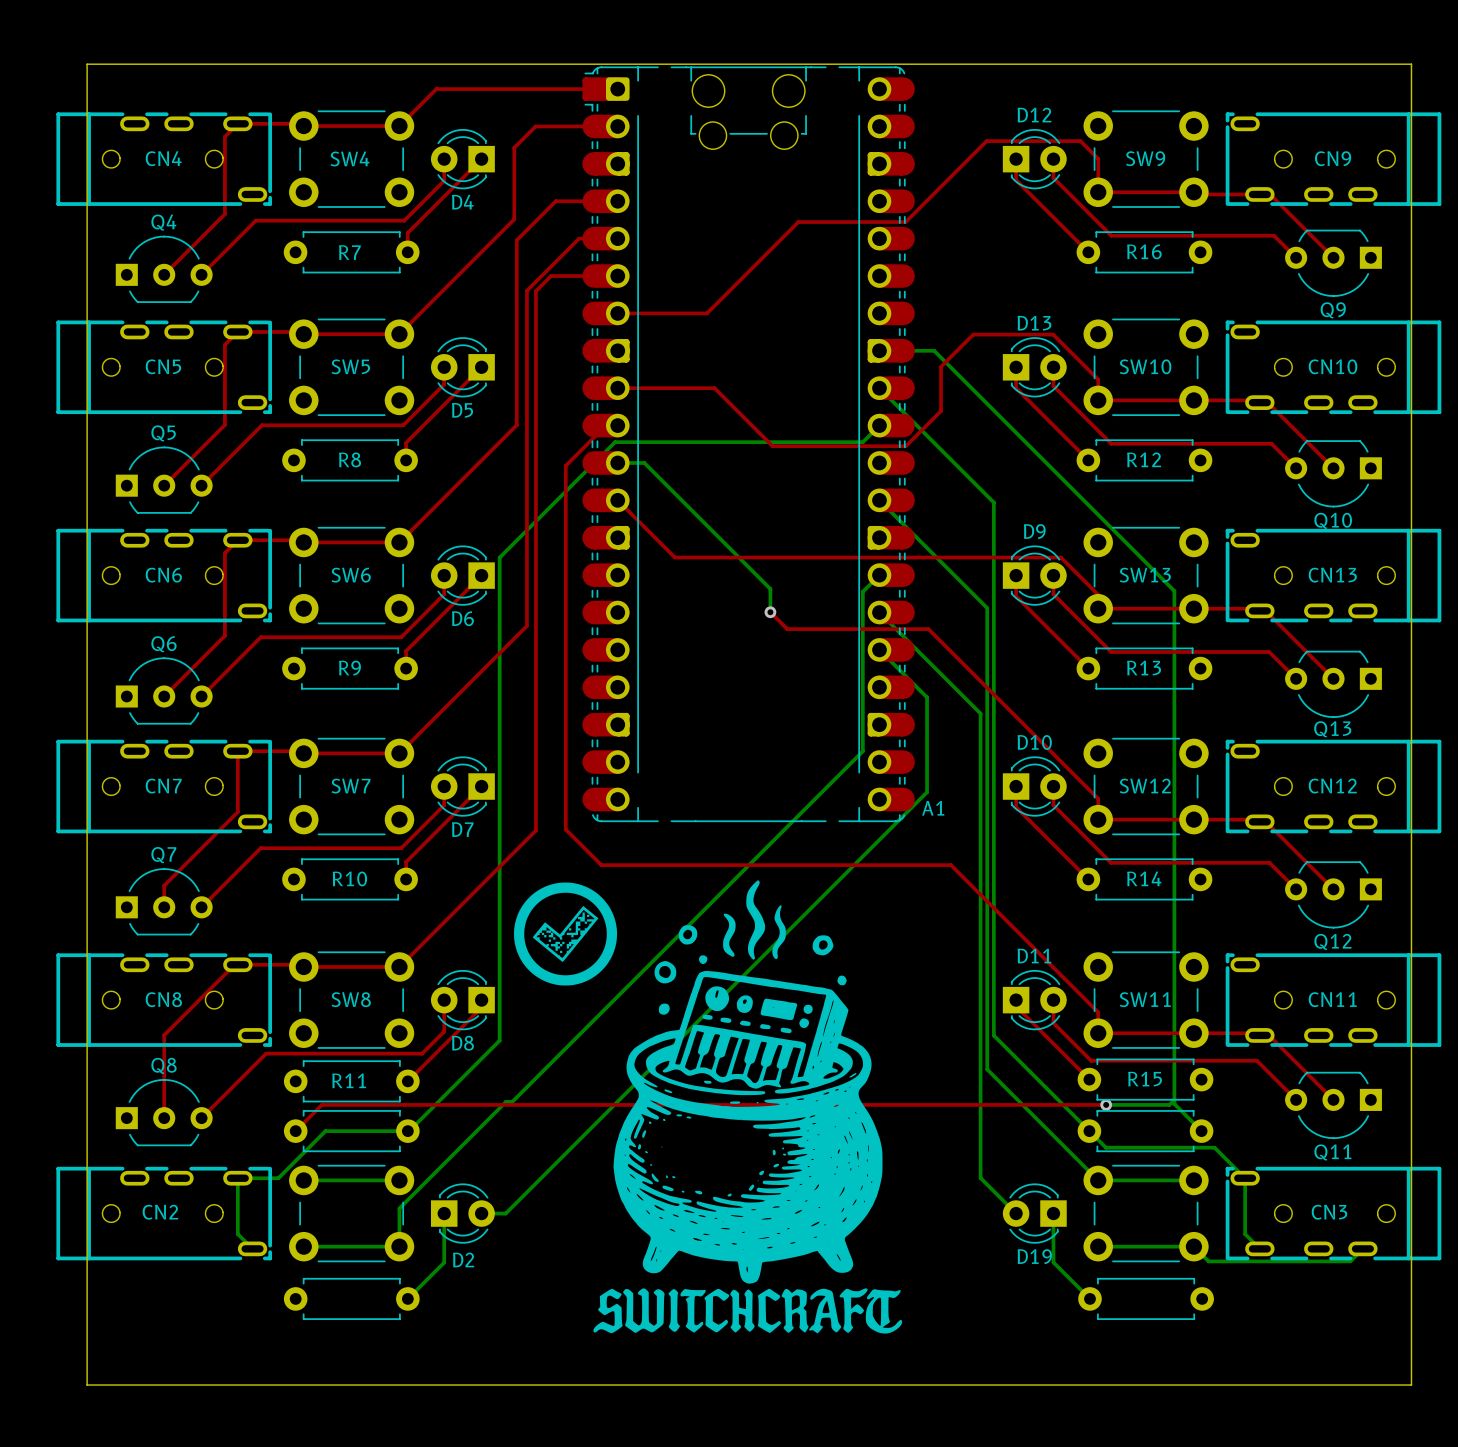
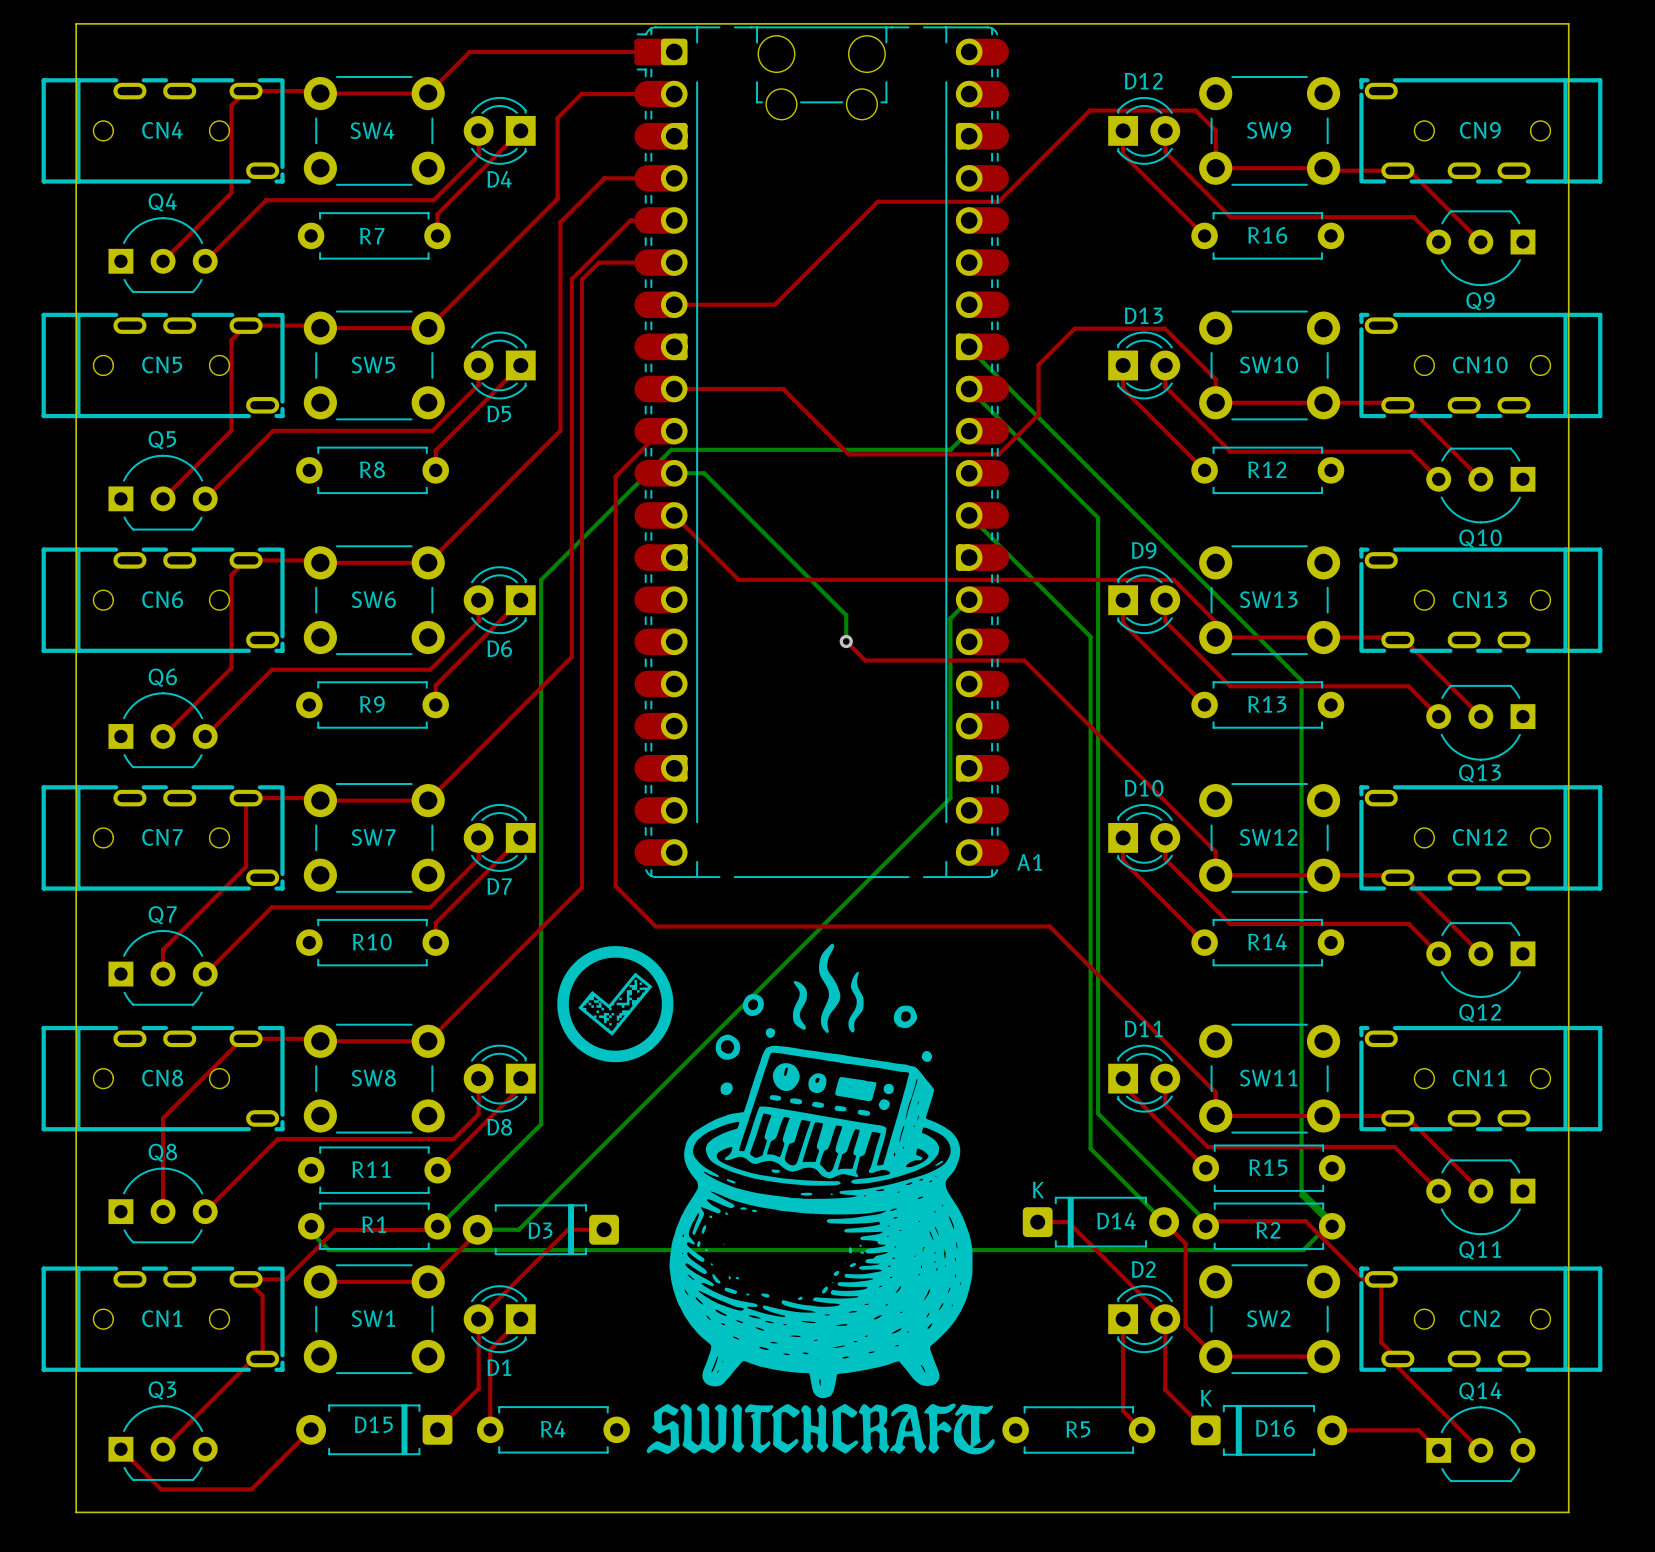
bottom track: (879, 350) (934, 350) (1174, 591) (1174, 646) -> (969, 348) (1301, 680)
bottom track: (879, 612) (980, 713) (980, 1178) (1016, 1213) -> none
bottom track: (879, 649) (927, 697) (927, 792) (505, 1213) (481, 1213) -> none
bottom track: (993, 1031) (993, 1035) (1105, 1147) (1214, 1147) (1245, 1178) (1245, 1234) (1259, 1248) -> (1098, 1113) (1205, 1221)
bottom track: (987, 1062) (987, 1069) (1098, 1180) (1193, 1180) -> (1090, 1148) (1164, 1222)
bottom track: (1174, 1099) (1169, 1104) (1106, 1104) -> (1301, 1190) (1332, 1221) (1303, 1250) (328, 1250) (308, 1230)
bottom track: (512, 1101) (505, 1101) (399, 1208) (399, 1246) (303, 1246) -> (555, 1193) (518, 1229) (477, 1229)
top track: (1106, 1104) (321, 1104) (295, 1131) -> none
via: (1106, 1104) -> none
top track: none -> (1205, 1221) (1305, 1221) (1363, 1279) (1381, 1279) (1381, 1342) (1397, 1358) (1397, 1367) (1480, 1450)
top track: none -> (1037, 1222) (1068, 1222) (1165, 1319) (1165, 1389) (1205, 1430)
D14: none -> (1100, 1222)
top track: none -> (1164, 1222) (1185, 1243) (1185, 1326) (1215, 1356) (1323, 1356)
R1 name: none -> R1 (374, 1224)
bottom track: (407, 1131) (325, 1131) (278, 1178) (237, 1178) (237, 1234) (252, 1248) -> none
top track: none -> (435, 1230) (335, 1230) (286, 1279) (246, 1279) (262, 1295) (262, 1358) (253, 1358) (163, 1449)
top track: none -> (477, 1229) (477, 1232) (428, 1281) (320, 1281)
D3: none -> (540, 1229)
top track: none -> (604, 1229) (568, 1229) (478, 1319) (478, 1388) (437, 1429)
R2 name: none -> R2 (1268, 1230)
bottom track: (303, 1180) (399, 1180) -> none
CN2 name: CN2 (160, 1212) -> CN1 (162, 1318)
CN3 name: CN3 (1329, 1212) -> CN2 (1479, 1318)
SW1 name: none -> SW1 (373, 1318)
bottom track: (444, 1213) (444, 1262) (407, 1298) -> none
D2 position: (462, 1213) -> (1144, 1319)
D1: none -> (499, 1319)
top track: none -> (520, 1319) (490, 1349) (490, 1429)
top track: none -> (1123, 1319) (1123, 1411) (1142, 1429)
D19: (1034, 1213) -> none
bottom track: (1053, 1213) (1053, 1262) (1089, 1298) -> none
SW2 name: none -> SW2 (1268, 1318)
bottom track: (1098, 1246) (1193, 1246) (1208, 1261) (1350, 1261) (1362, 1248) -> none
D2 name position: D2 (463, 1259) -> D2 (1143, 1269)
part: (351, 1298) -> none
part: (1146, 1298) -> none
top track: none -> (311, 1429) (251, 1489) (161, 1489) (120, 1449)
D15: none -> (374, 1429)
R4: none -> (553, 1429)
R5: none -> (1078, 1429)
D16: none -> (1268, 1430)
top track: none -> (1332, 1430) (1418, 1430) (1438, 1450)
Q3: none -> (163, 1443)
Q14: none -> (1480, 1444)

